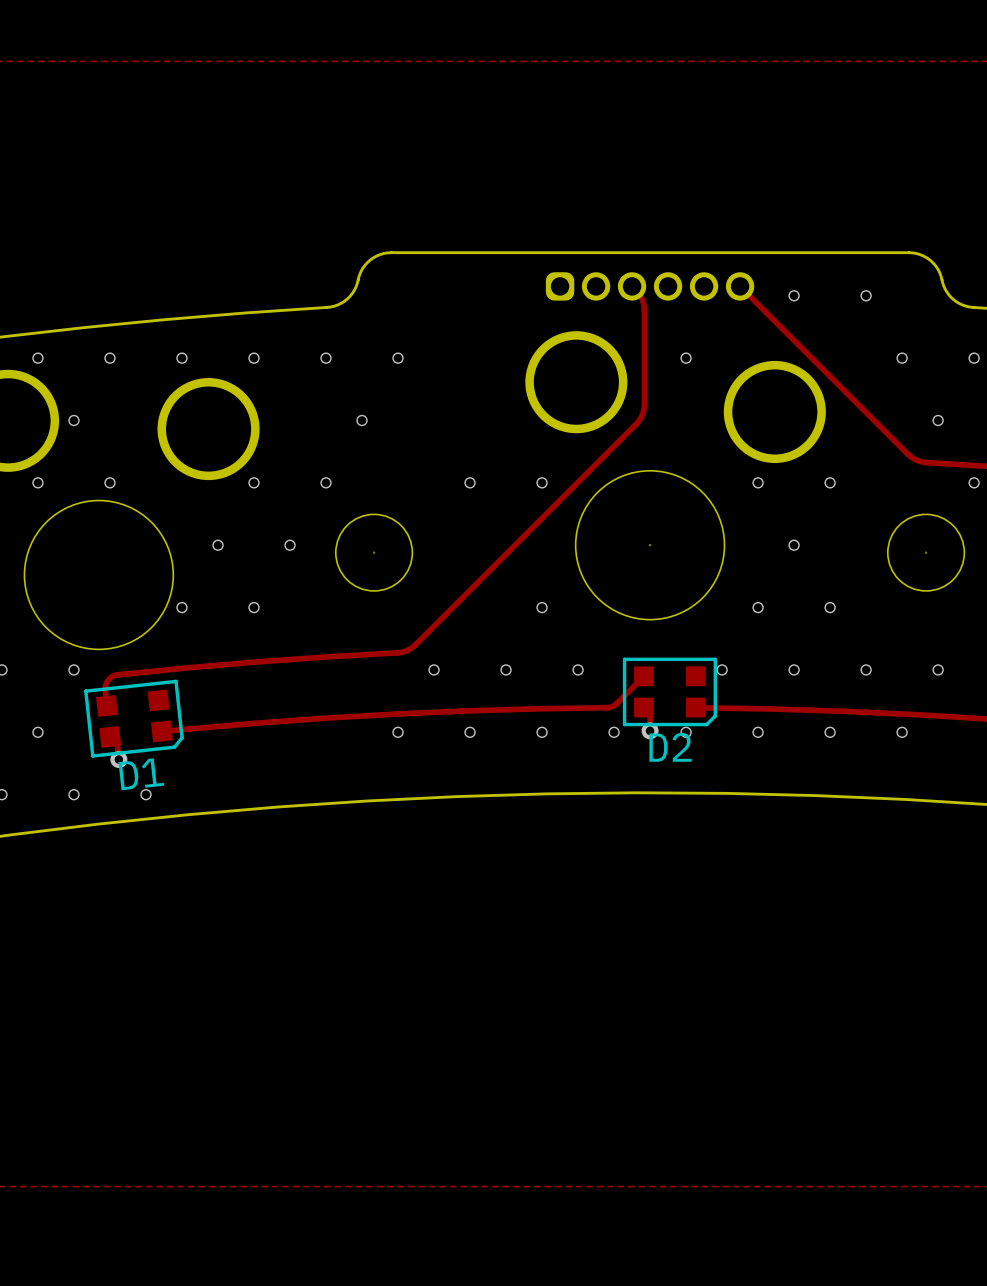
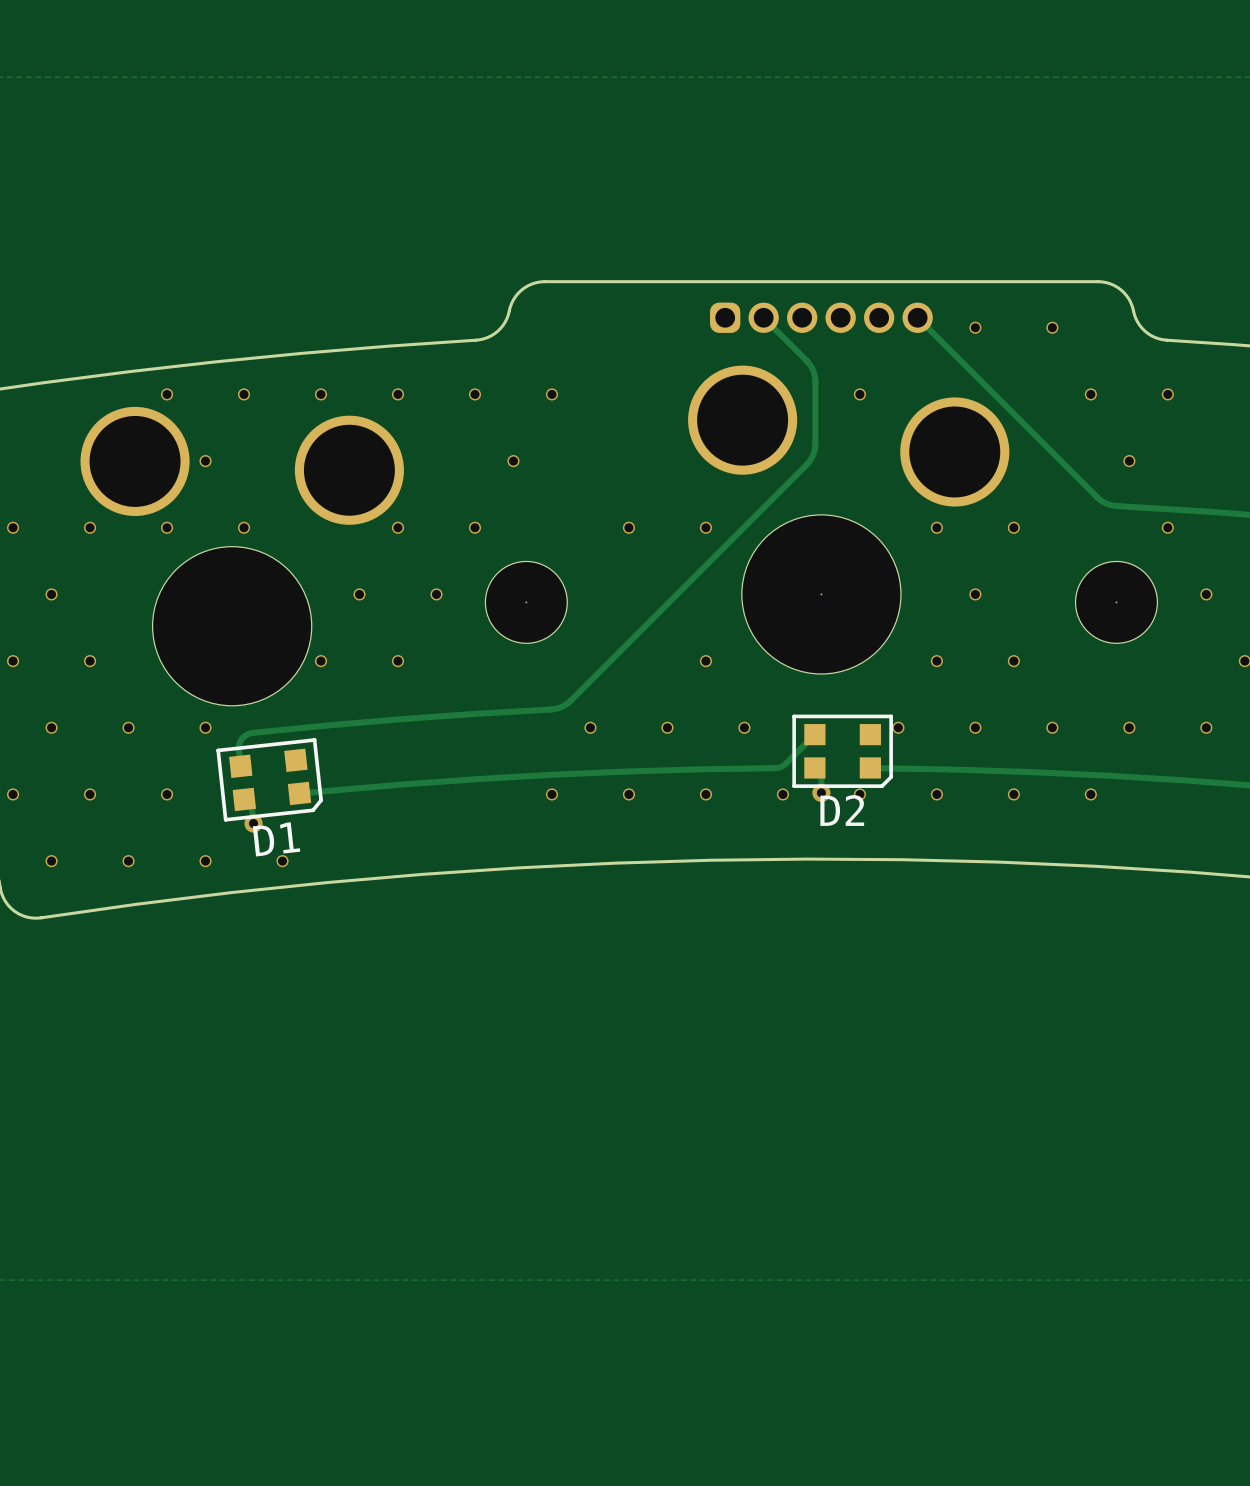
track: (632, 286) (639, 294) (643, 305) (644, 346) -> (763, 317) (808, 362) (814, 373) (815, 382)

